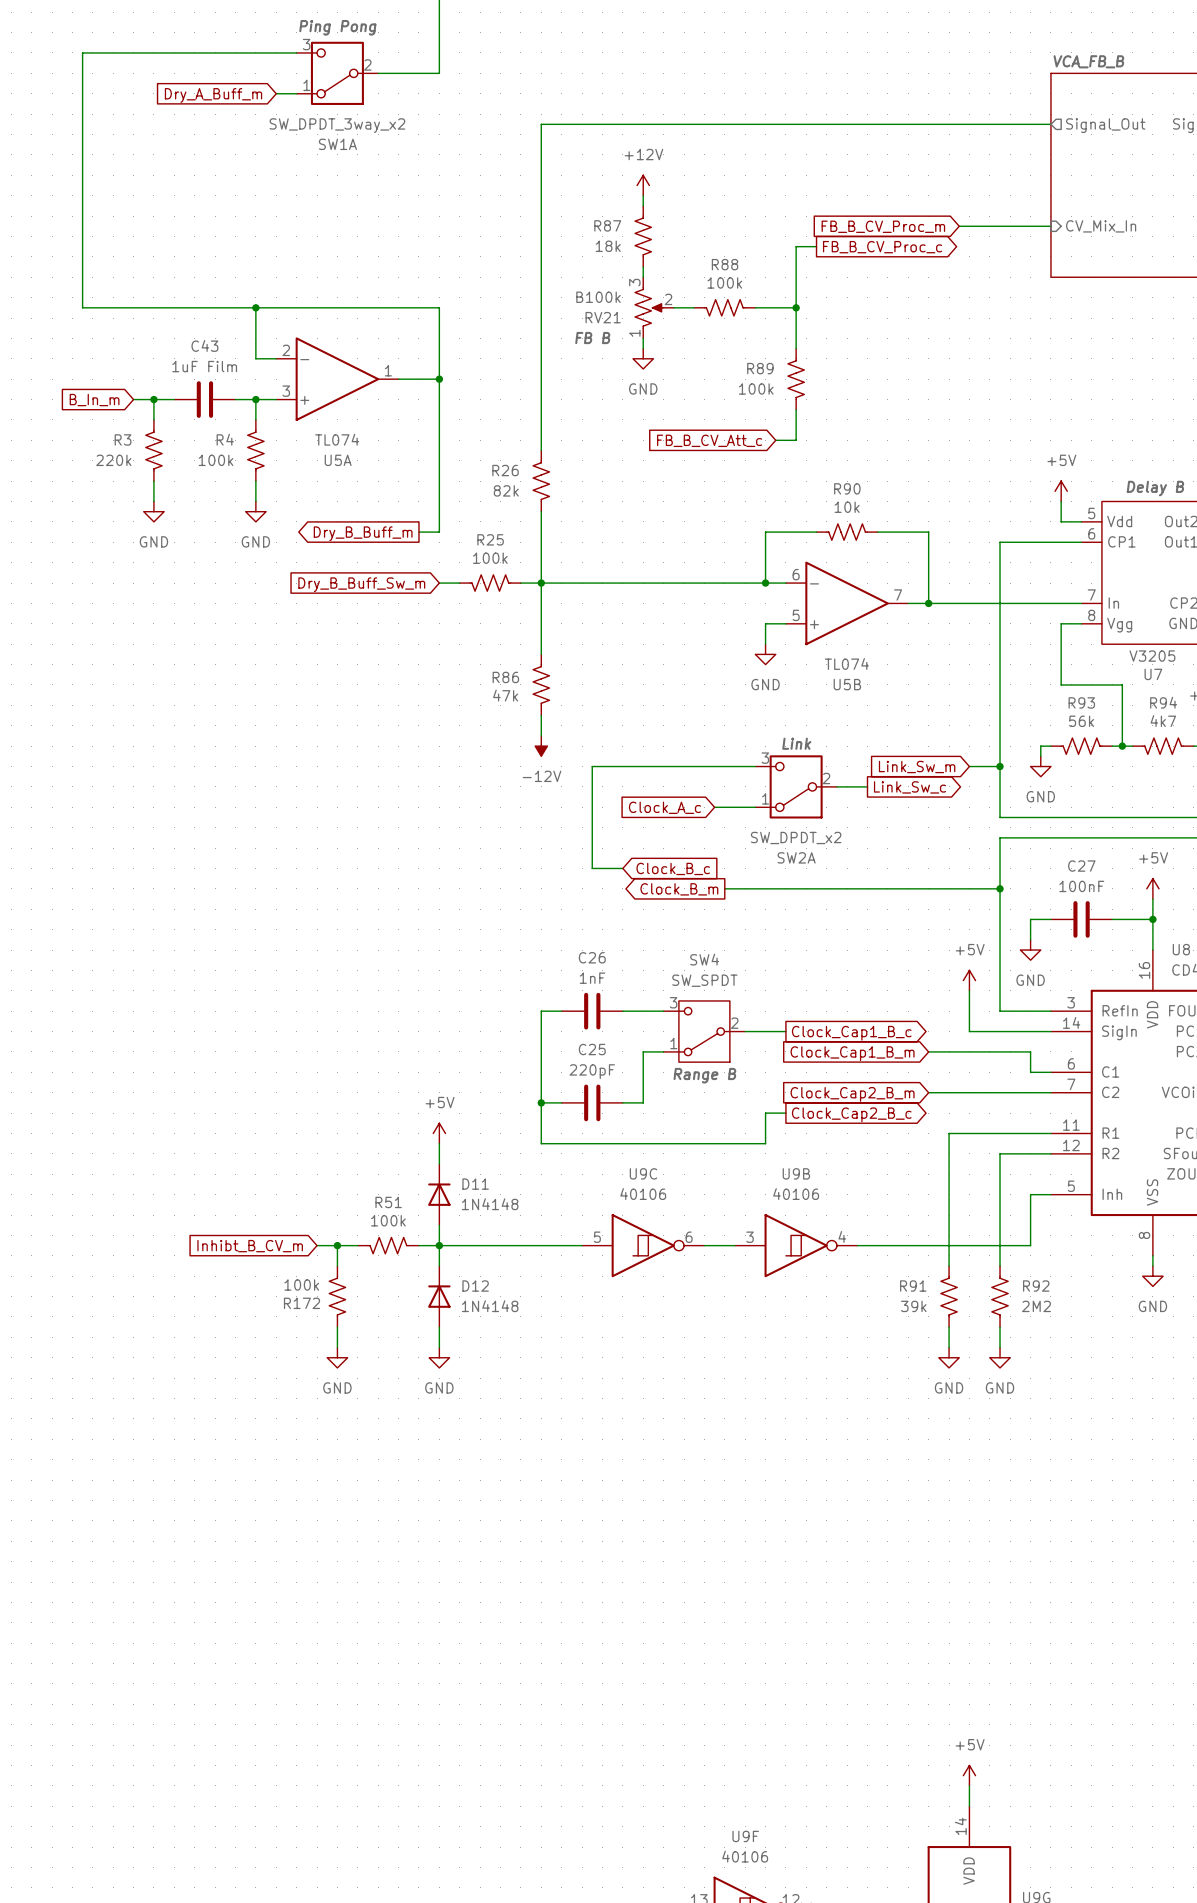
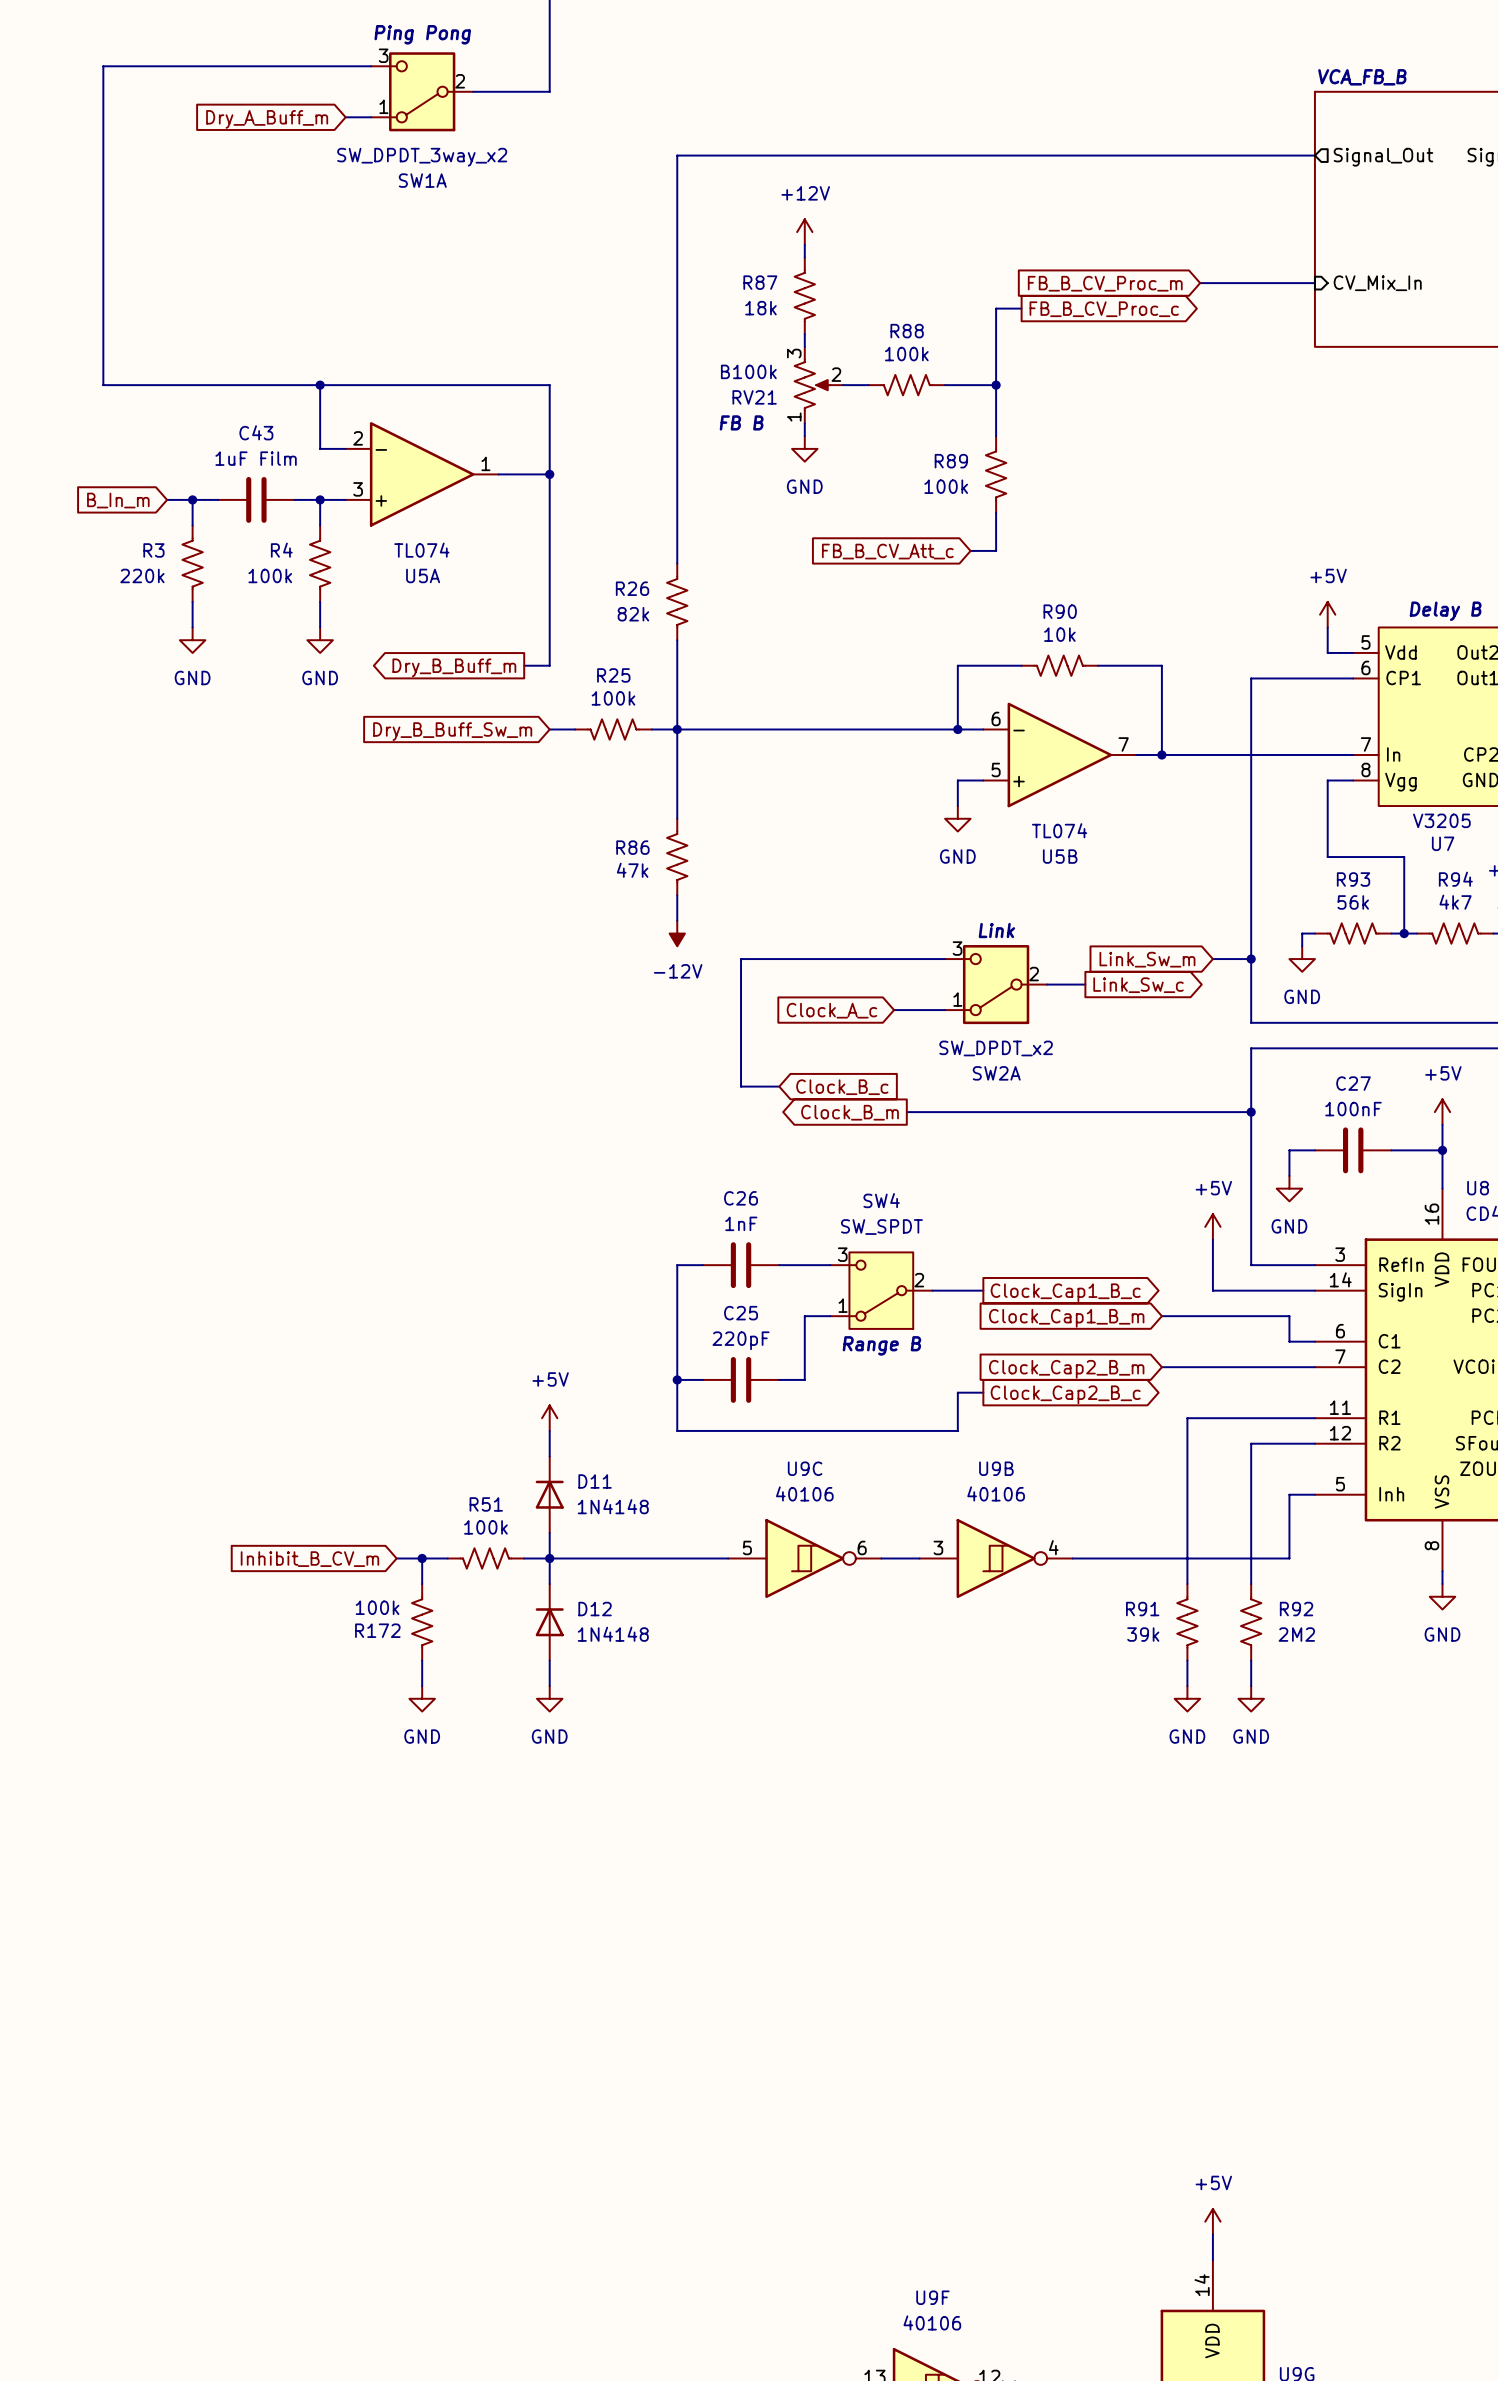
global label: Inhibt_B_CV_m (250, 1246) -> Inhibit_B_CV_m (309, 1559)

